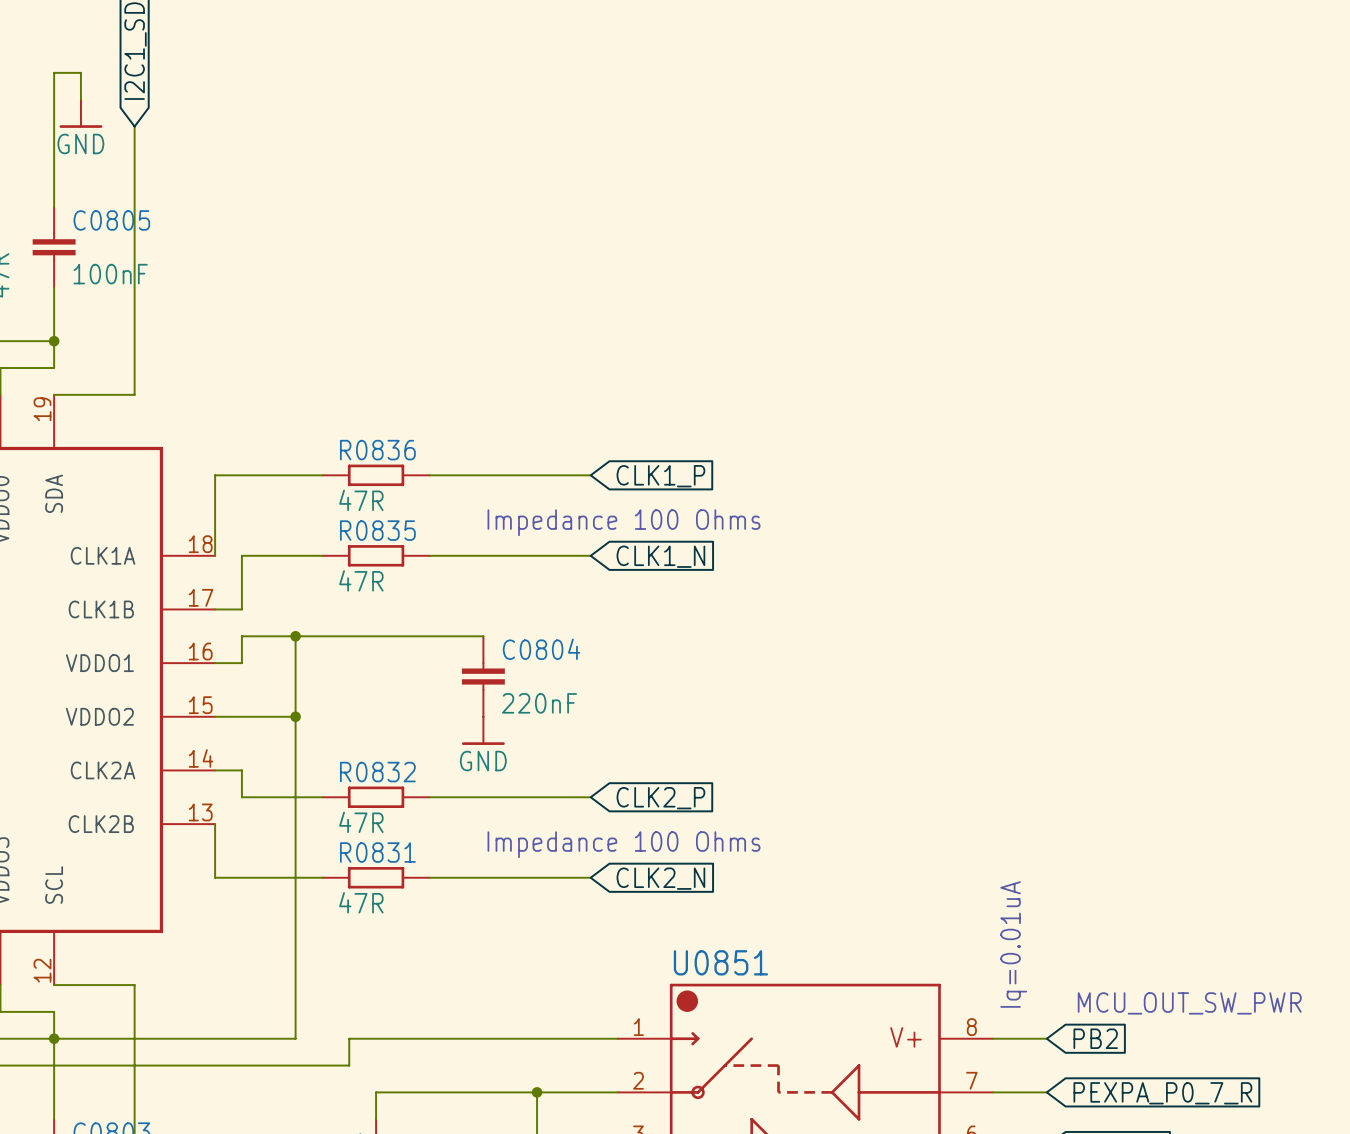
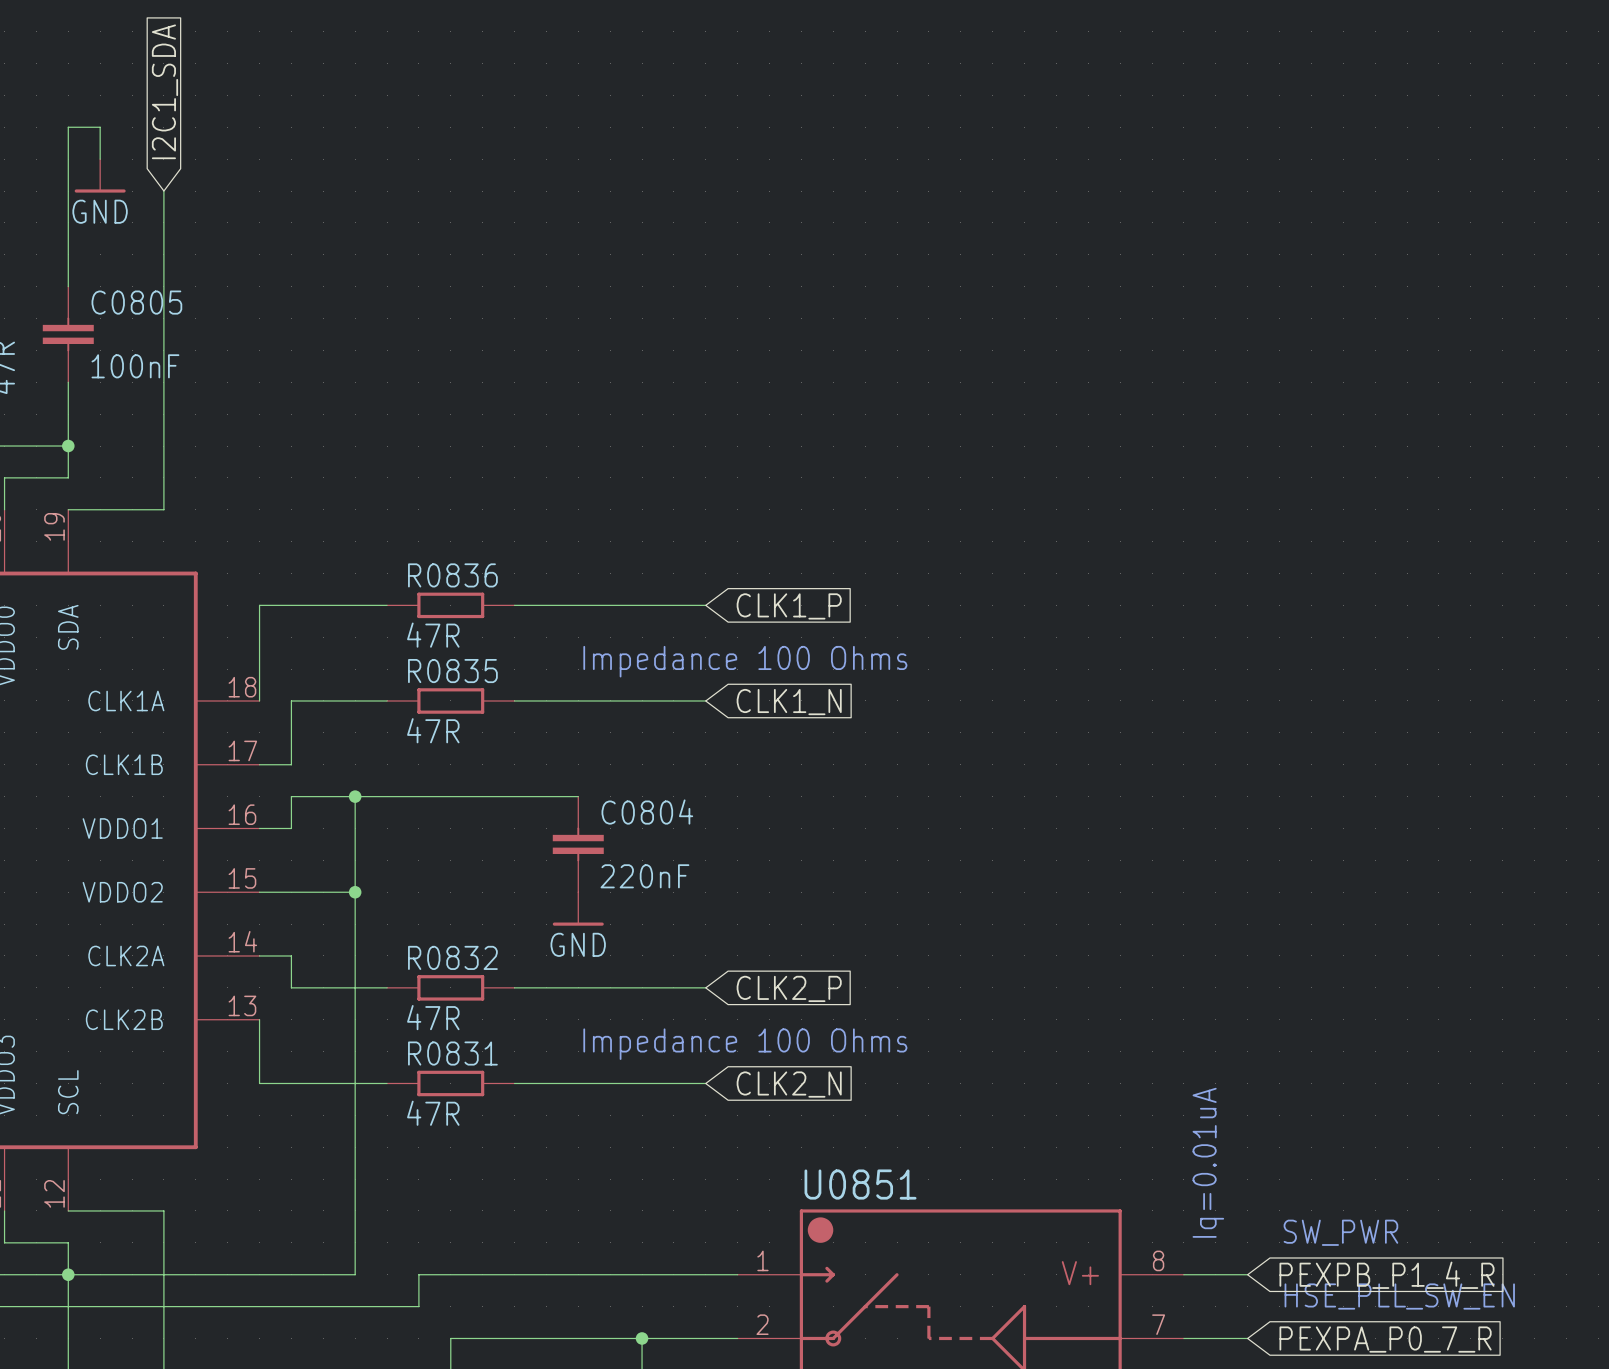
text: MCU_OUT_SW_PWR (1189, 1003) -> SW_PWR (1340, 1232)
global label: PB2 (1095, 1038) -> PEXPB_P1_4_R (1386, 1275)
text: none -> HSE_PLL_SW_EN (1399, 1296)

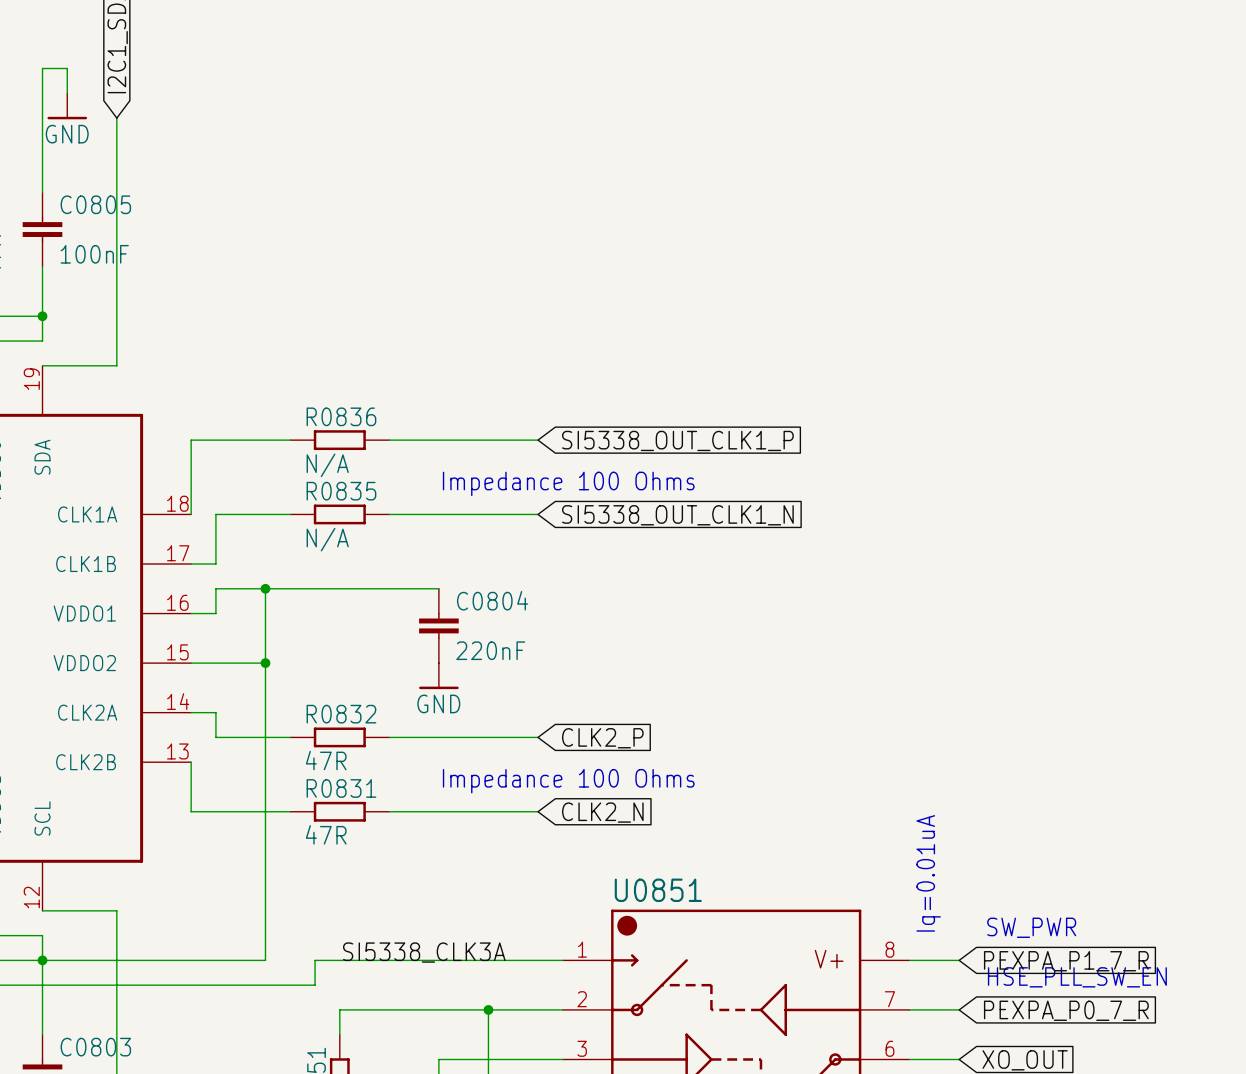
global label: CLK1_P (789, 606) -> SI5338_OUT_CLK1_P (677, 440)
R0836 value: 47R (433, 635) -> N/A (327, 465)
global label: CLK1_N (789, 702) -> SI5338_OUT_CLK1_N (677, 515)
R0835 value: 47R (433, 730) -> N/A (327, 539)
label: none -> SI5338_CLK3A (424, 952)
global label: PEXPB_P1_4_R (1386, 1275) -> PEXPA_P1_7_R (1066, 961)

